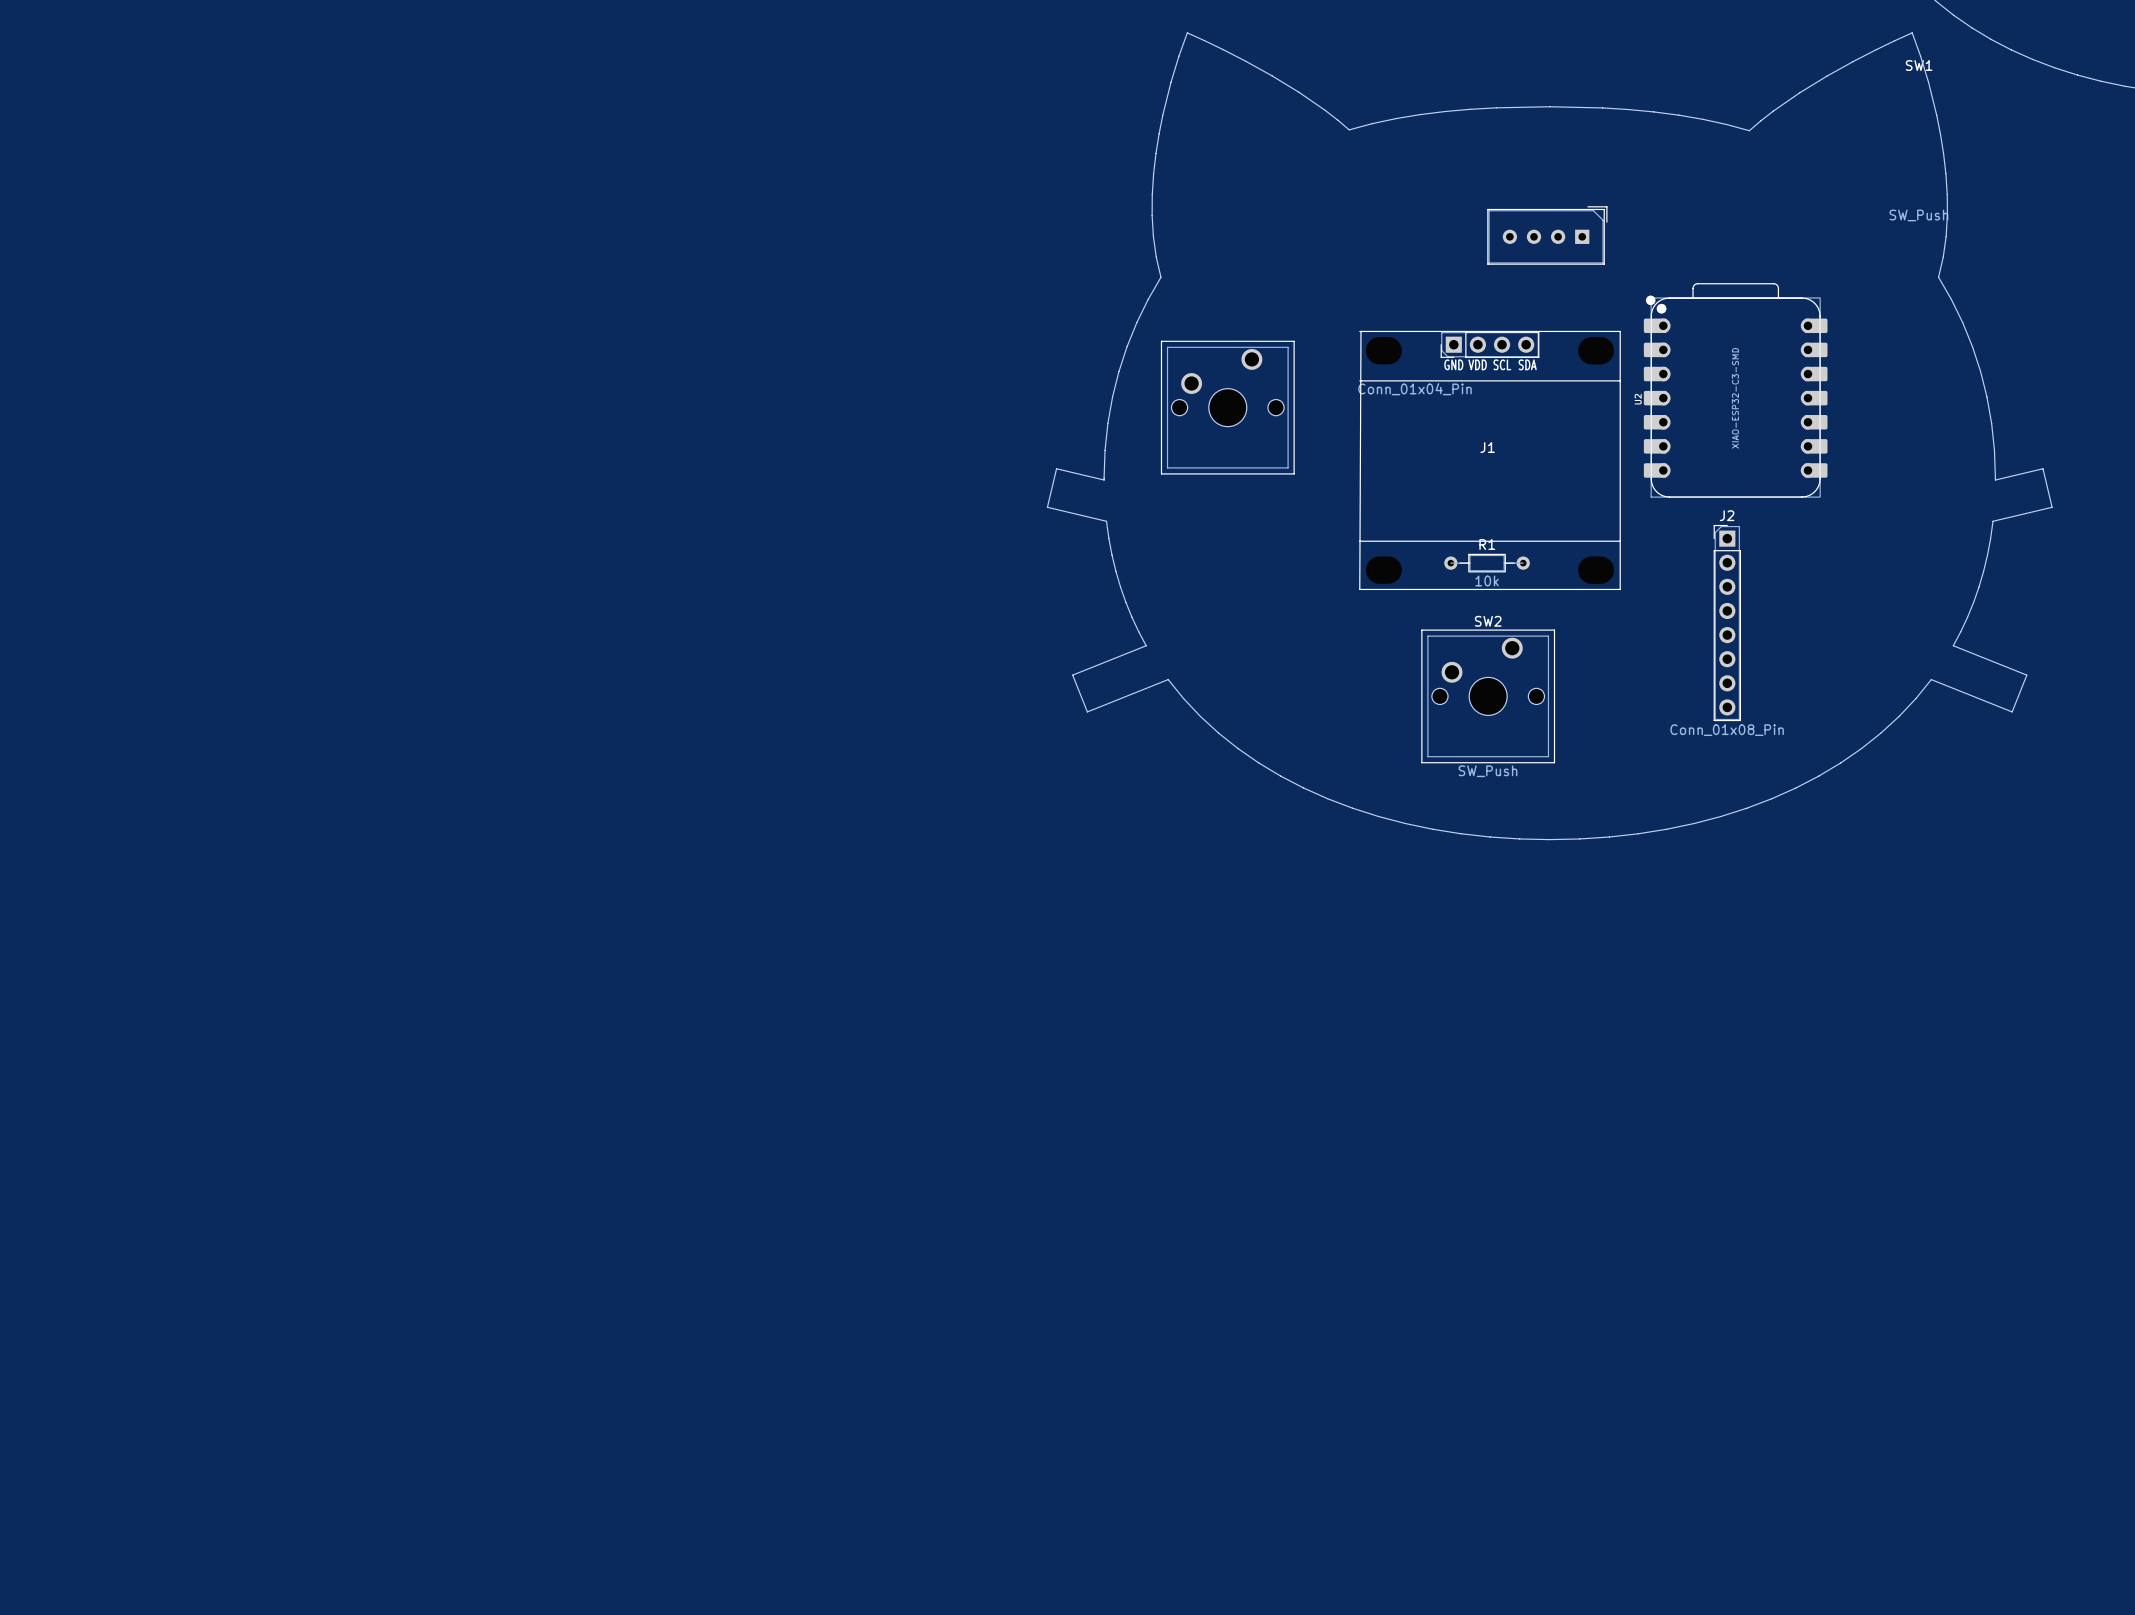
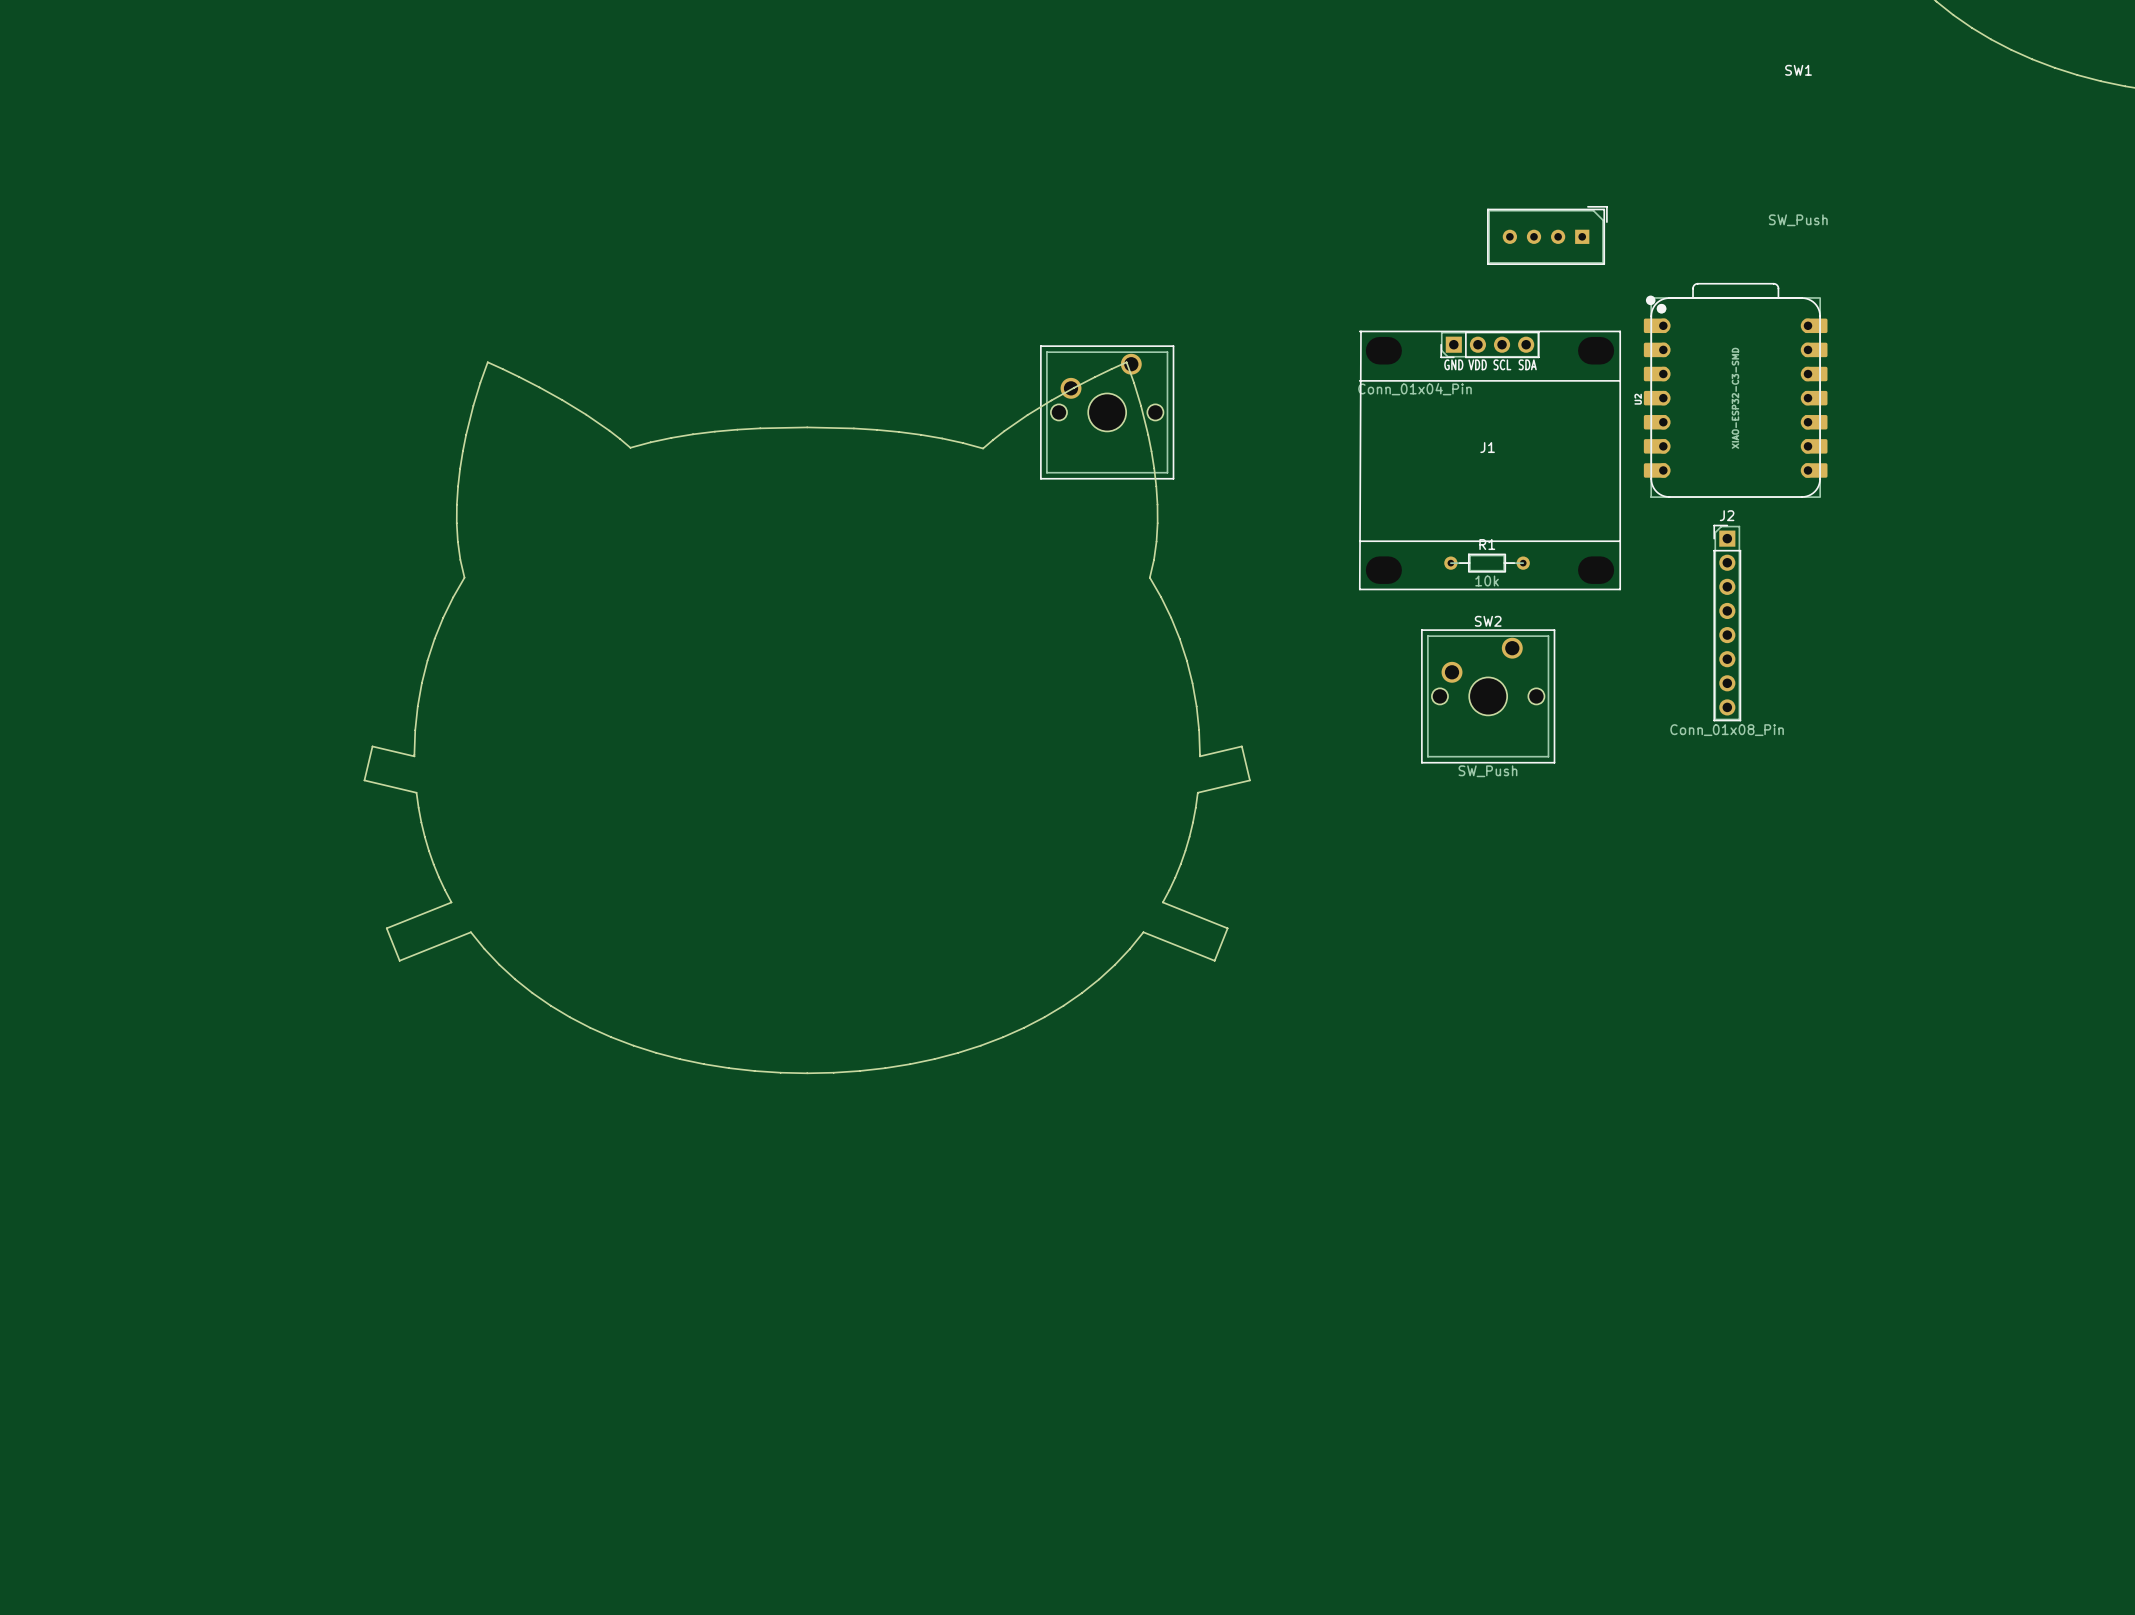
board edge: (1187, 32) (1170, 82) (1162, 115) (1153, 173) (1153, 236) (1160, 277) (1136, 322) (1118, 371) (1107, 423) (1104, 480) (1056, 468) (1047, 507) (1106, 521) (1112, 555) (1120, 587) (1132, 617) (1146, 645) (1072, 675) (1087, 711) (1168, 679) (1200, 716) (1238, 748) (1280, 776) (1327, 798) (1378, 816) (1432, 829) (1490, 837) (1549, 839) (1609, 837) (1666, 829) (1721, 816) (1771, 798) (1818, 776) (1861, 748) (1899, 716) (1931, 679) (2012, 711) (2026, 675) (1953, 645) (1967, 617) (1978, 587) (1987, 555) (1992, 521) (2052, 507) (2042, 468) (1995, 480) (1991, 423) (1980, 371) (1962, 322) (1938, 277) (1946, 236) (1945, 173) (1936, 115) (1928, 82) (1912, 32) (1826, 76) (1773, 111) (1749, 130) (1702, 119) (1653, 111) (1549, 106) (1445, 111) (1395, 118) (1349, 129) (1325, 110) (1271, 75) (1187, 32) -> none
board edge: none -> (487, 362) (466, 435) (458, 486) (457, 541) (464, 577) (443, 617) (427, 660) (417, 706) (414, 756) (372, 746) (364, 780) (416, 792) (428, 850) (451, 902) (386, 928) (399, 960) (470, 932) (499, 964) (532, 993) (569, 1017) (611, 1037) (656, 1052) (704, 1064) (754, 1071) (807, 1073) (859, 1071) (910, 1064) (958, 1052) (1002, 1037) (1044, 1017) (1081, 993) (1115, 964) (1143, 932) (1214, 960) (1227, 928) (1162, 902) (1185, 850) (1197, 792) (1249, 780) (1241, 746) (1199, 756) (1196, 706) (1186, 660) (1171, 617) (1149, 577) (1156, 541) (1156, 486) (1148, 434) (1126, 362) (1051, 400) (1004, 431) (983, 448) (942, 438) (899, 431) (807, 427) (714, 431) (671, 437) (630, 447) (609, 430) (562, 400) (487, 362)
SW1 position: (1227, 407) -> (1107, 412)

